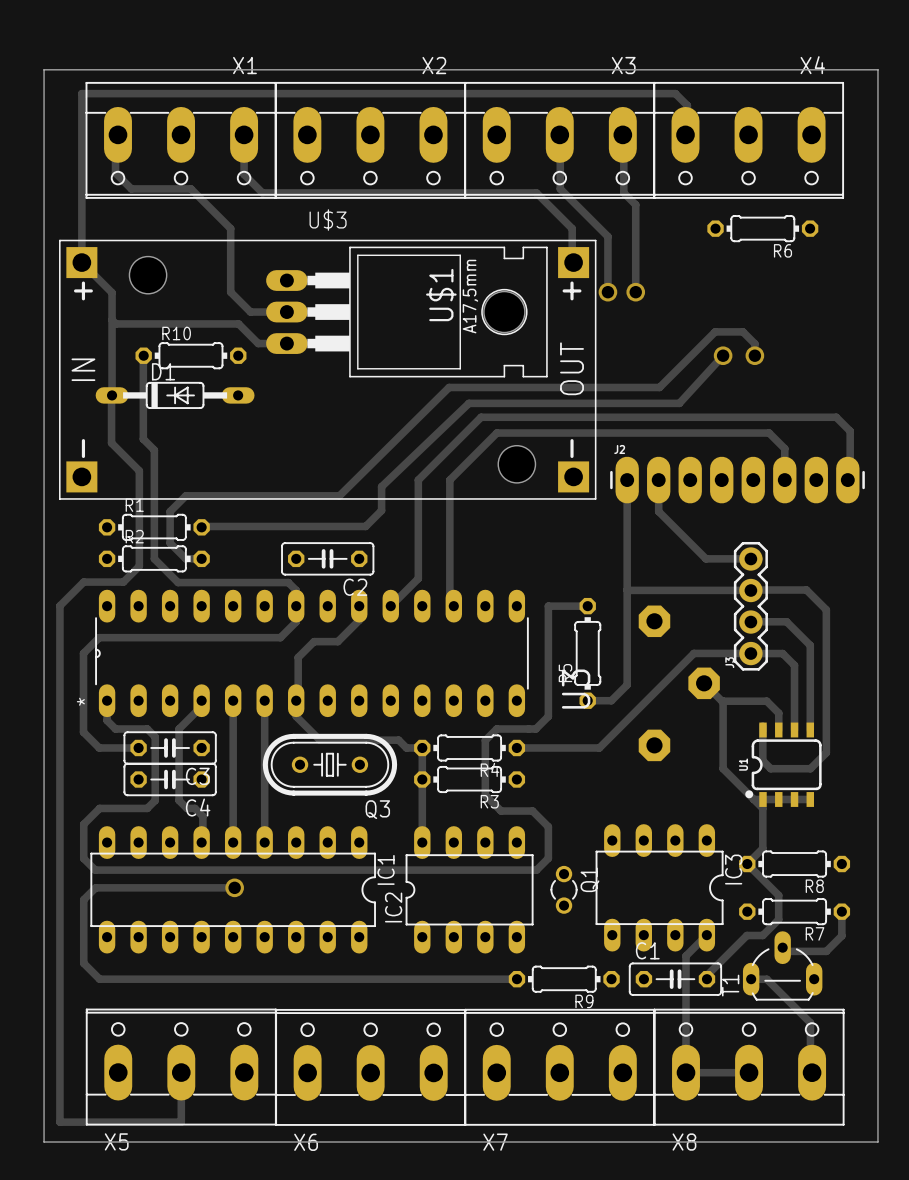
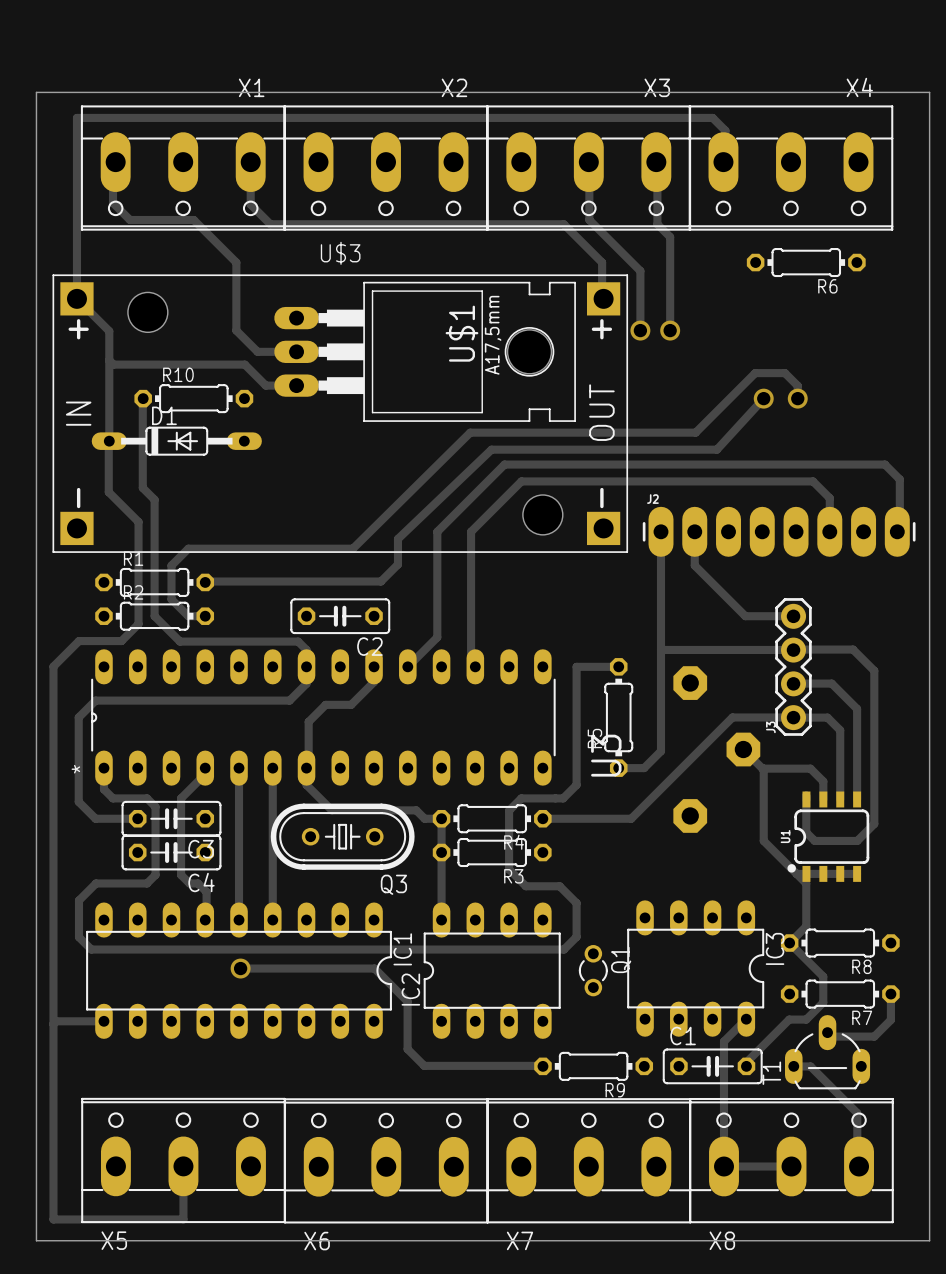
track: (234, 887) (95, 887) (83, 899) (83, 963) (99, 979) (516, 979) -> (240, 968) (374, 968) (407, 1001) (407, 1049) (424, 1065) (542, 1065)
track: none -> (103, 1021) (56, 1021) (53, 1024)

